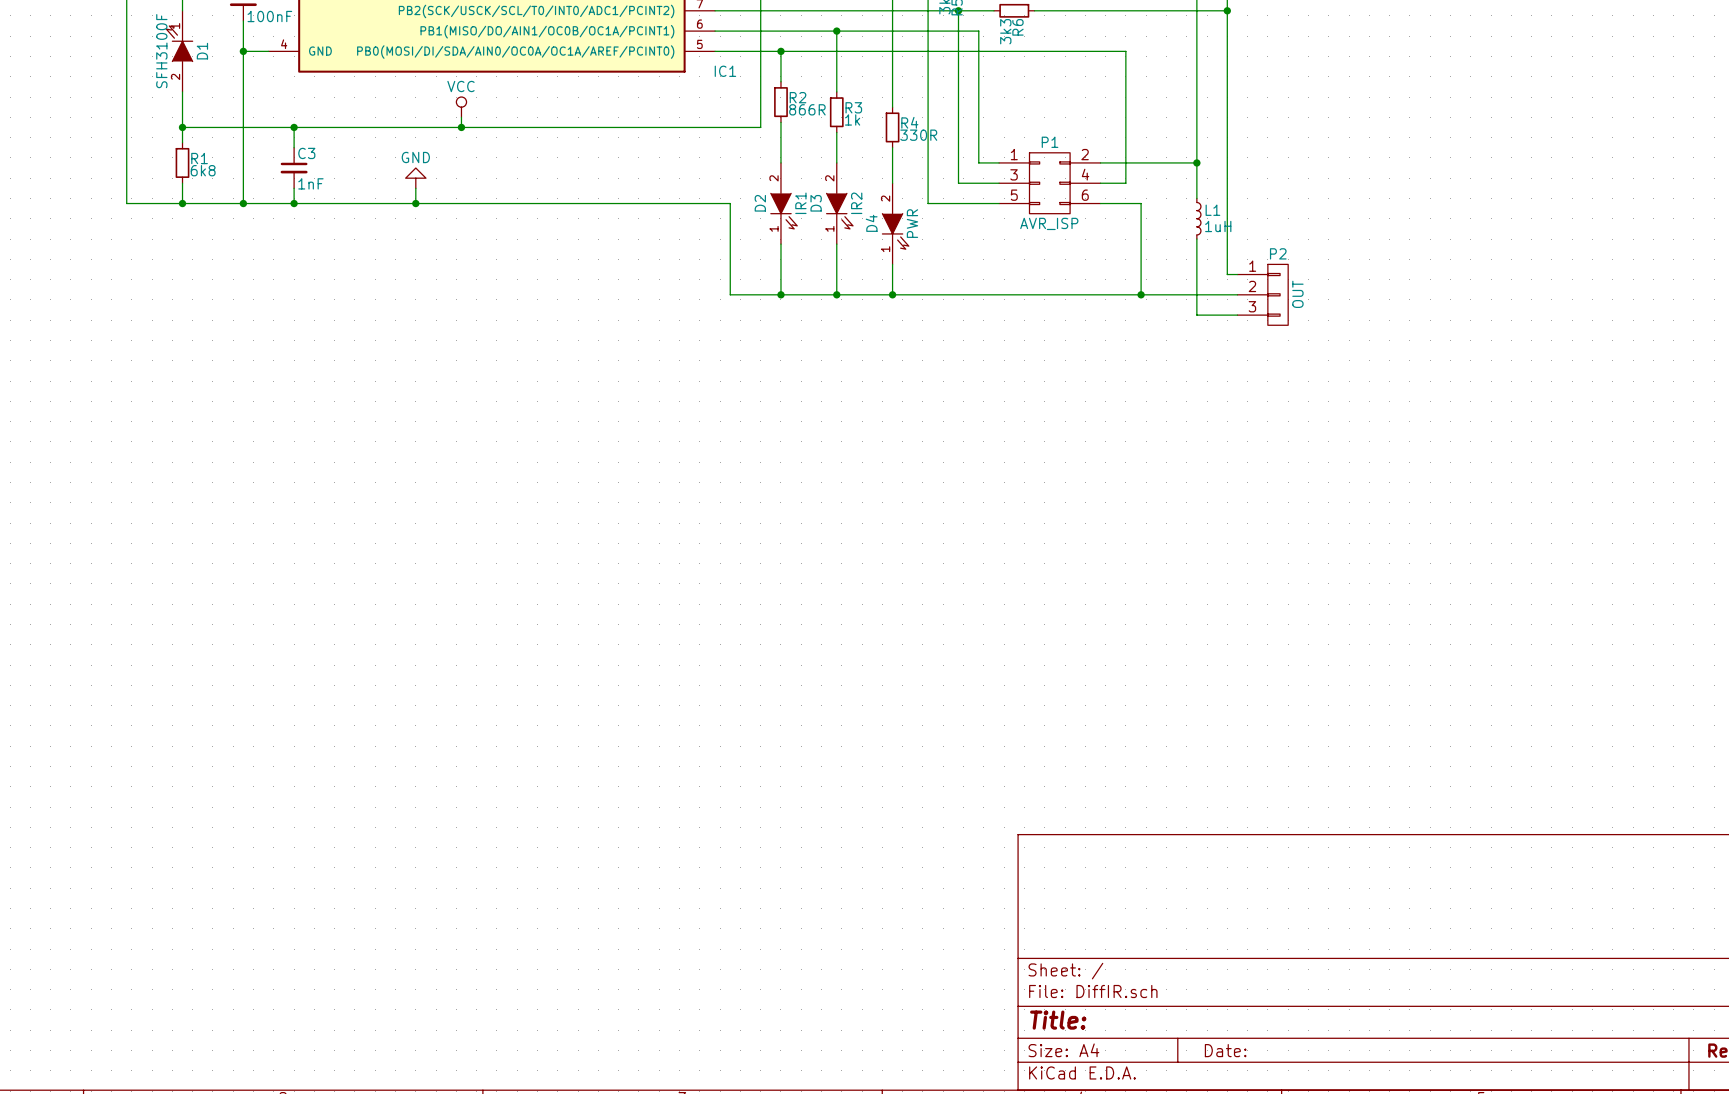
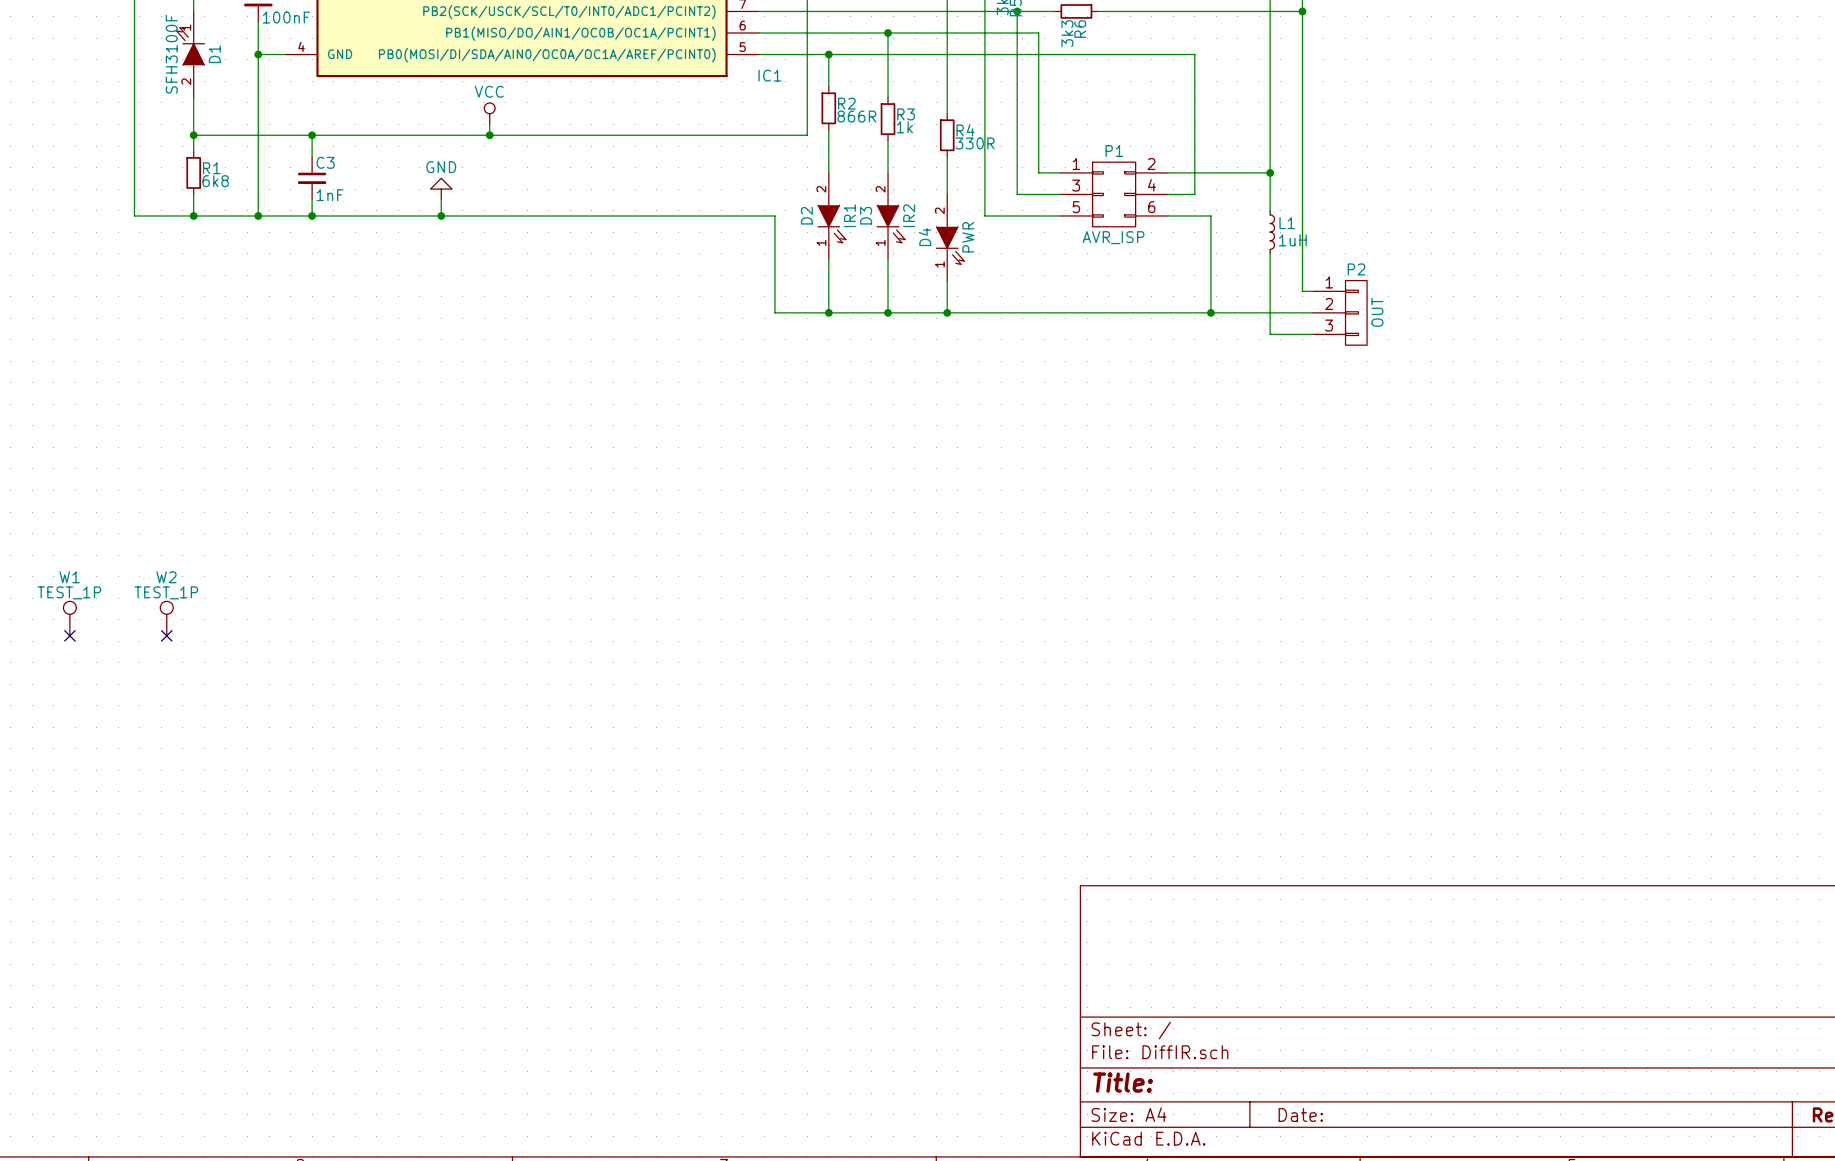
W1: none -> TEST_1P (69, 618)
W2: none -> TEST_1P (166, 618)
no-connect mark: none -> (69, 635)
no-connect mark: none -> (166, 635)

